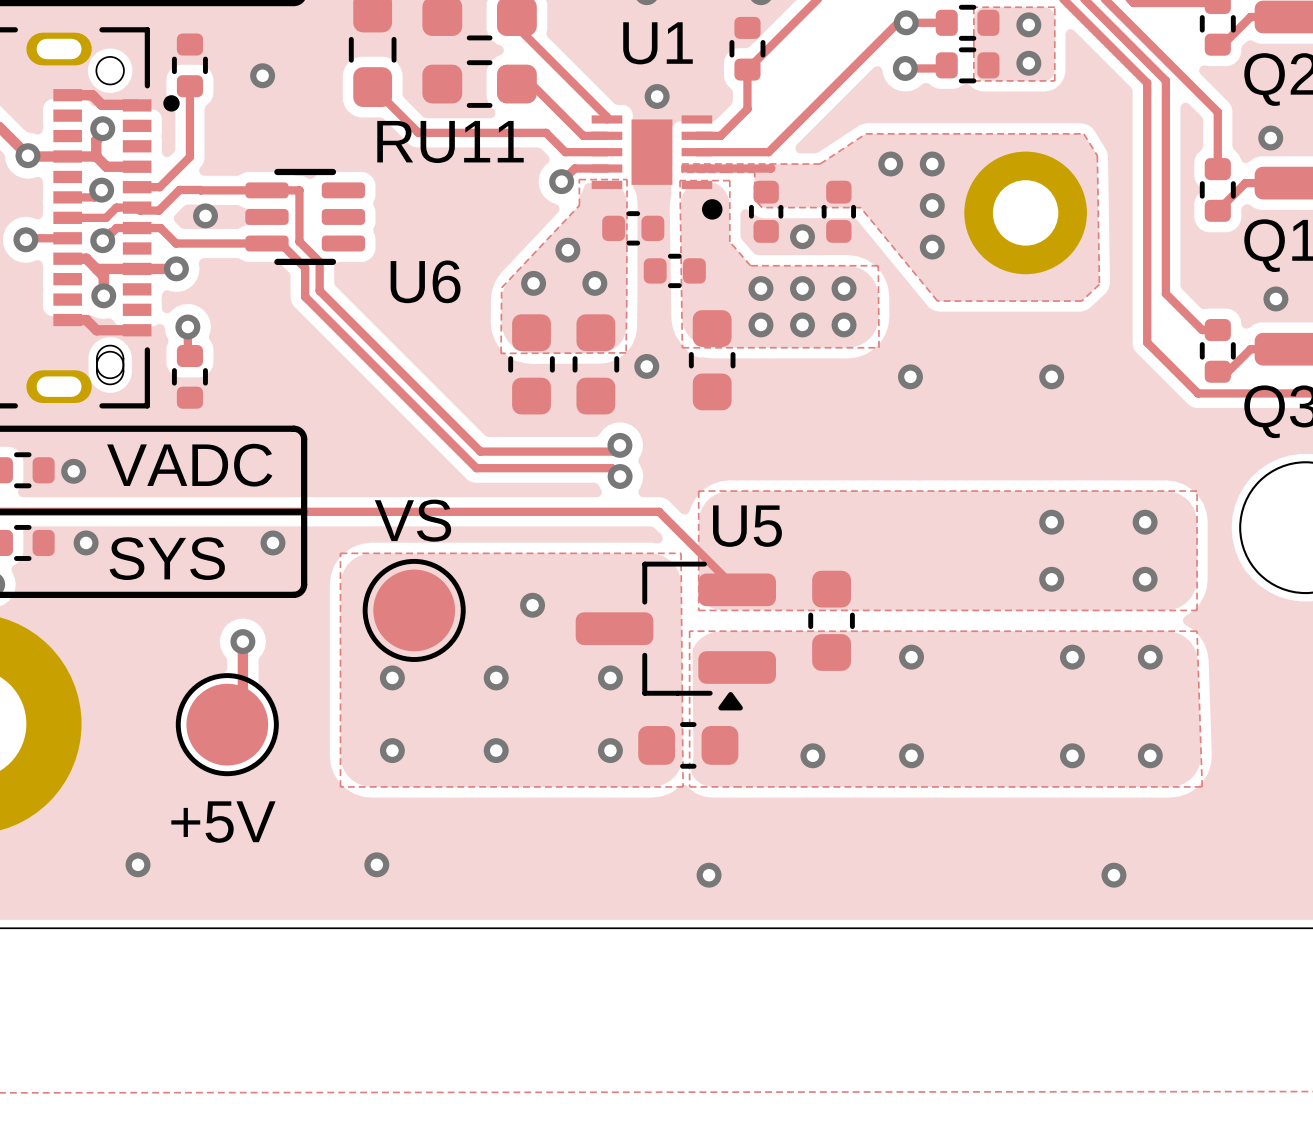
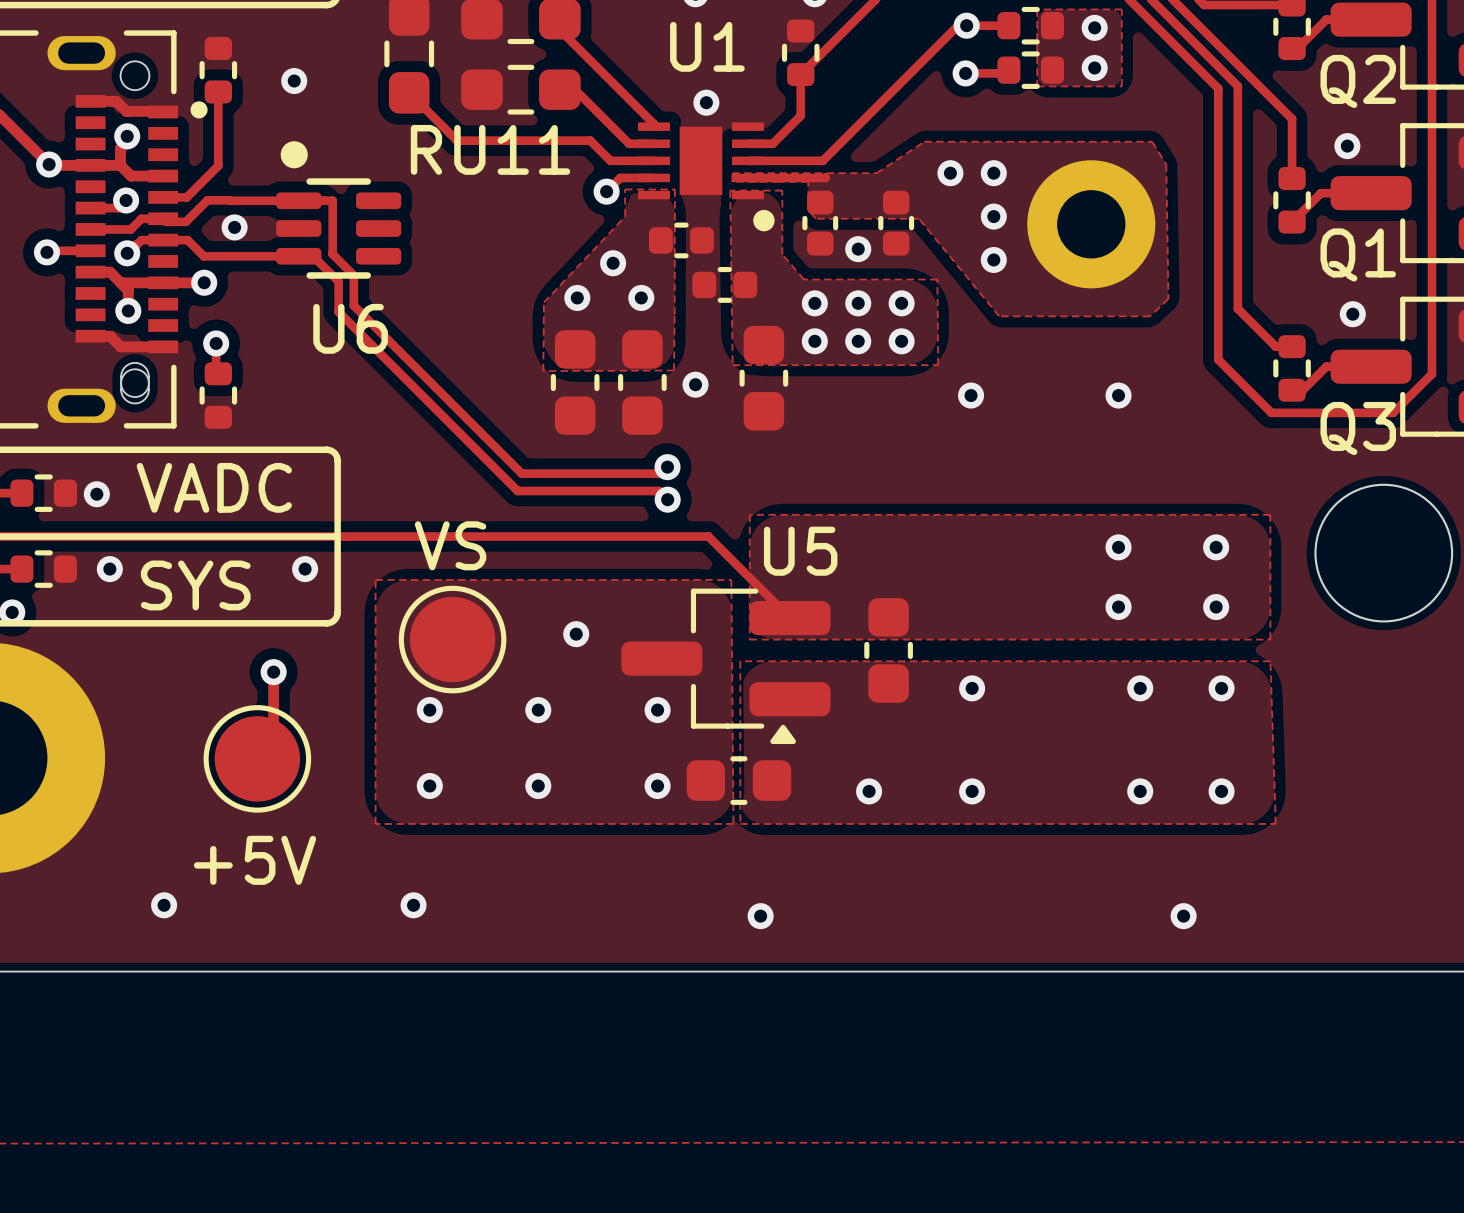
drawing: none -> [280, 141, 308, 169]
U6 name position: U6 (425, 281) -> U6 (350, 328)

